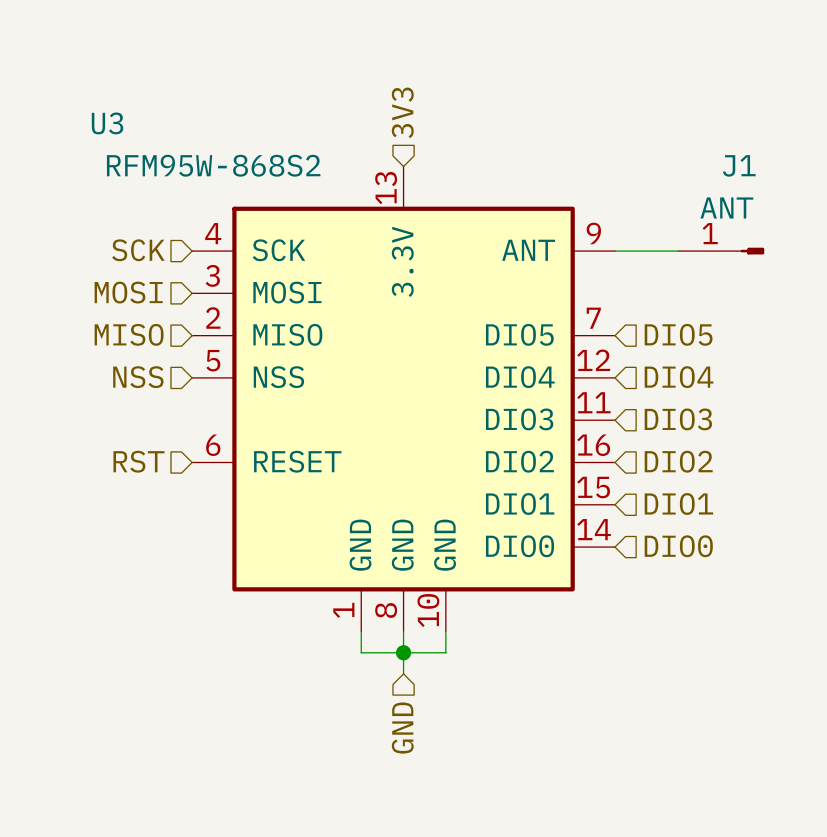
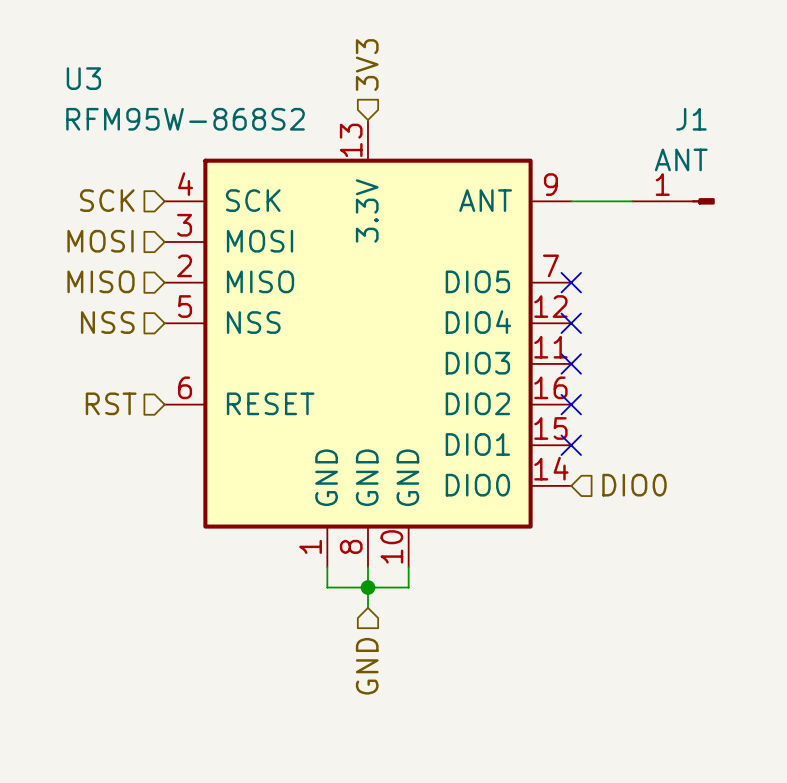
hierarchical label: DIO5 (678, 334) -> none
no-connect mark: none -> (571, 282)
no-connect mark: none -> (571, 323)
hierarchical label: DIO4 (679, 377) -> none
hierarchical label: DIO3 (678, 419) -> none
no-connect mark: none -> (571, 363)
hierarchical label: DIO2 (678, 461) -> none
no-connect mark: none -> (571, 404)
hierarchical label: DIO1 (678, 503) -> none
no-connect mark: none -> (571, 445)

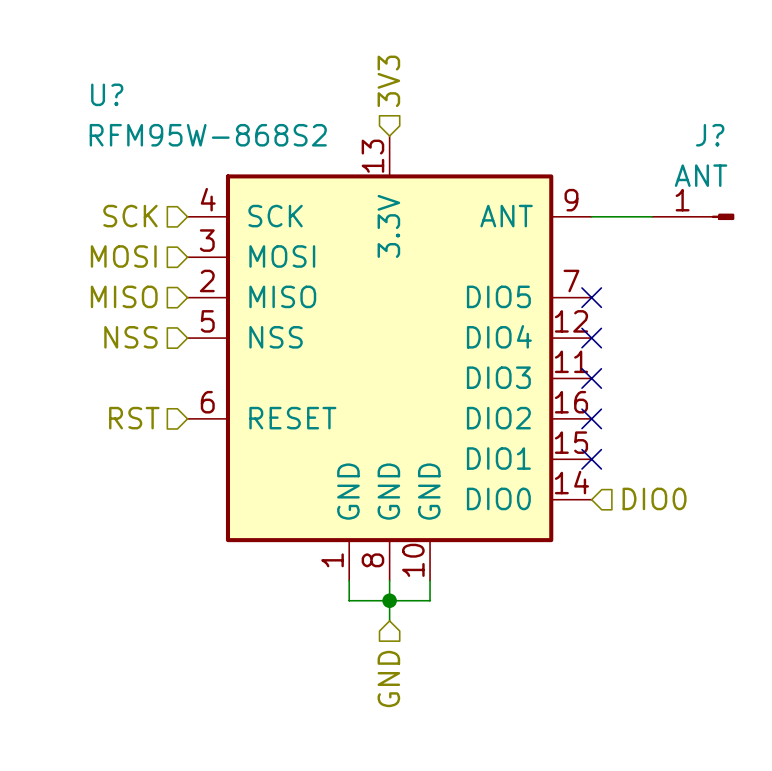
U3 name: U3 (83, 78) -> U? (107, 94)
J1 name: J1 (691, 119) -> J? (710, 135)

